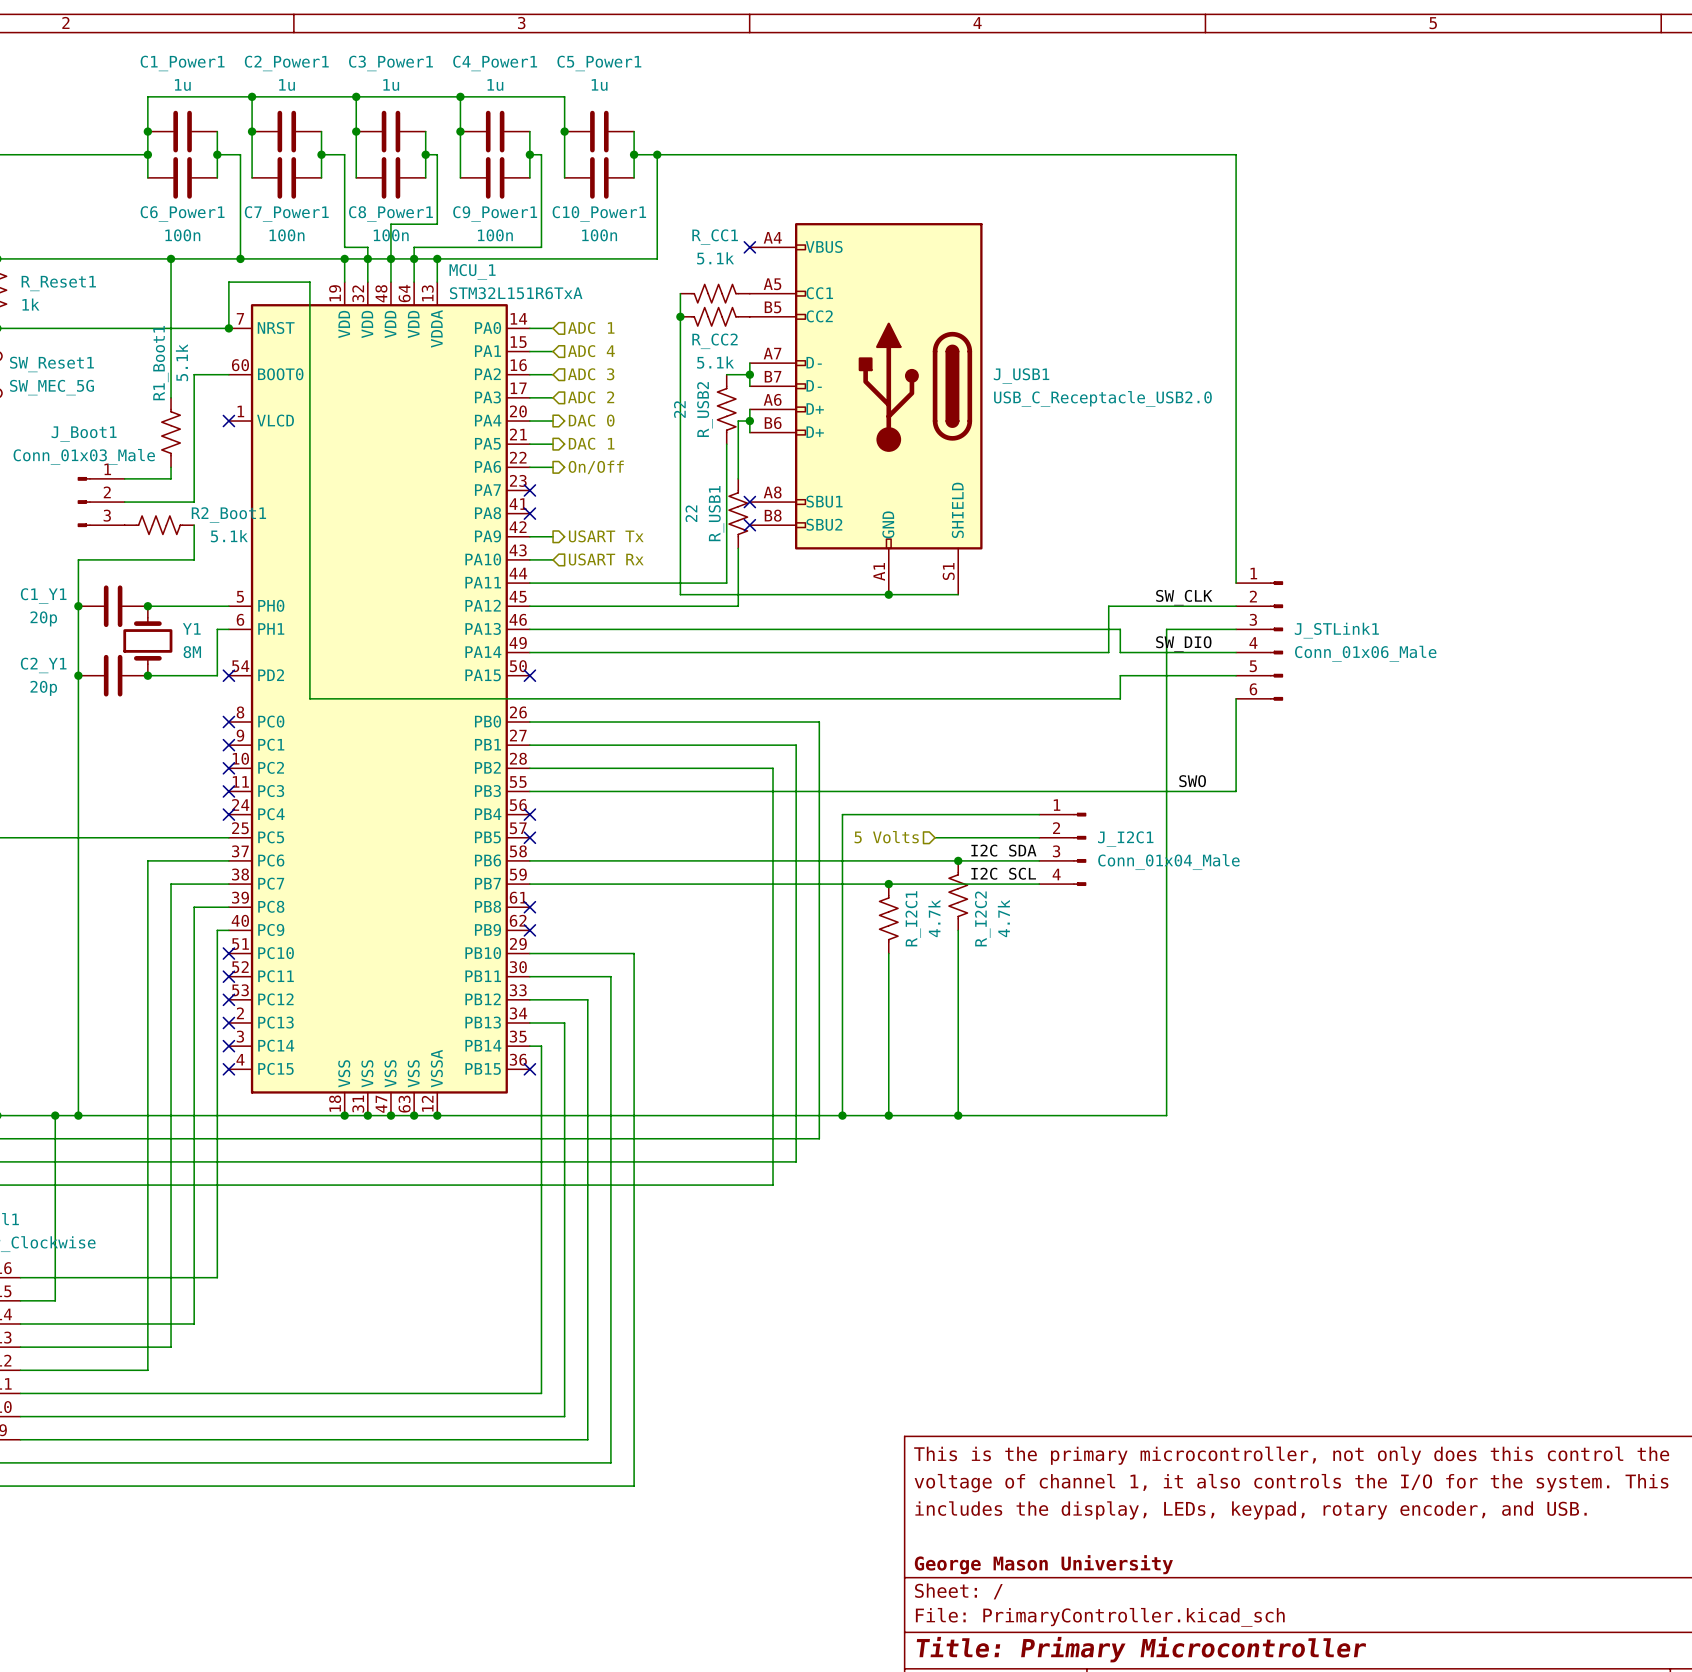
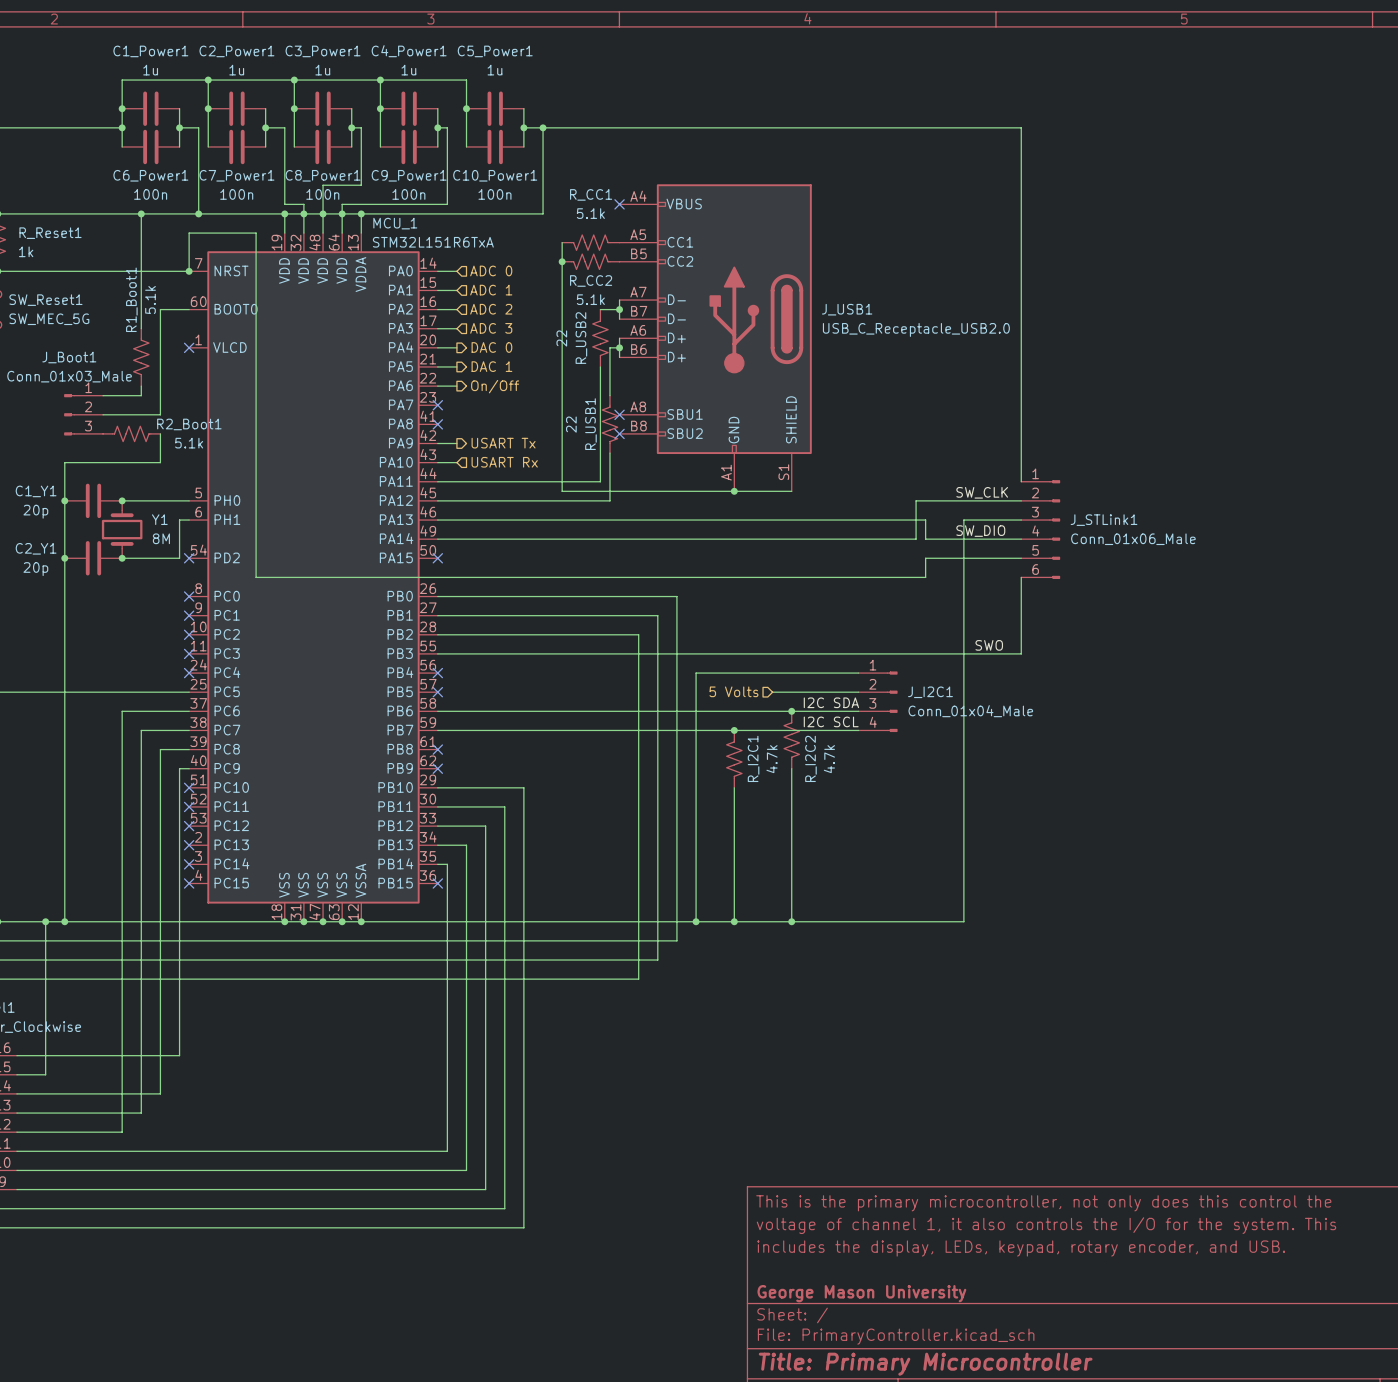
hierarchical label: ADC 1 (591, 327) -> ADC 0 (491, 270)
hierarchical label: ADC 4 (591, 351) -> ADC 1 (491, 290)
hierarchical label: ADC 3 (591, 374) -> ADC 2 (491, 309)
hierarchical label: ADC 2 (591, 397) -> ADC 3 (491, 328)

